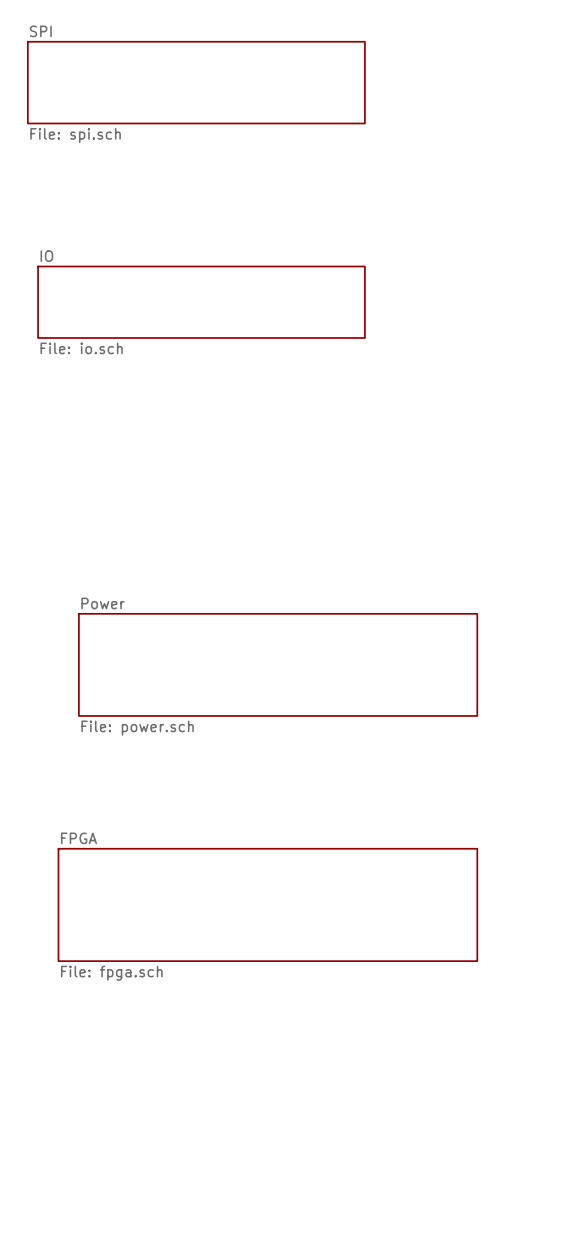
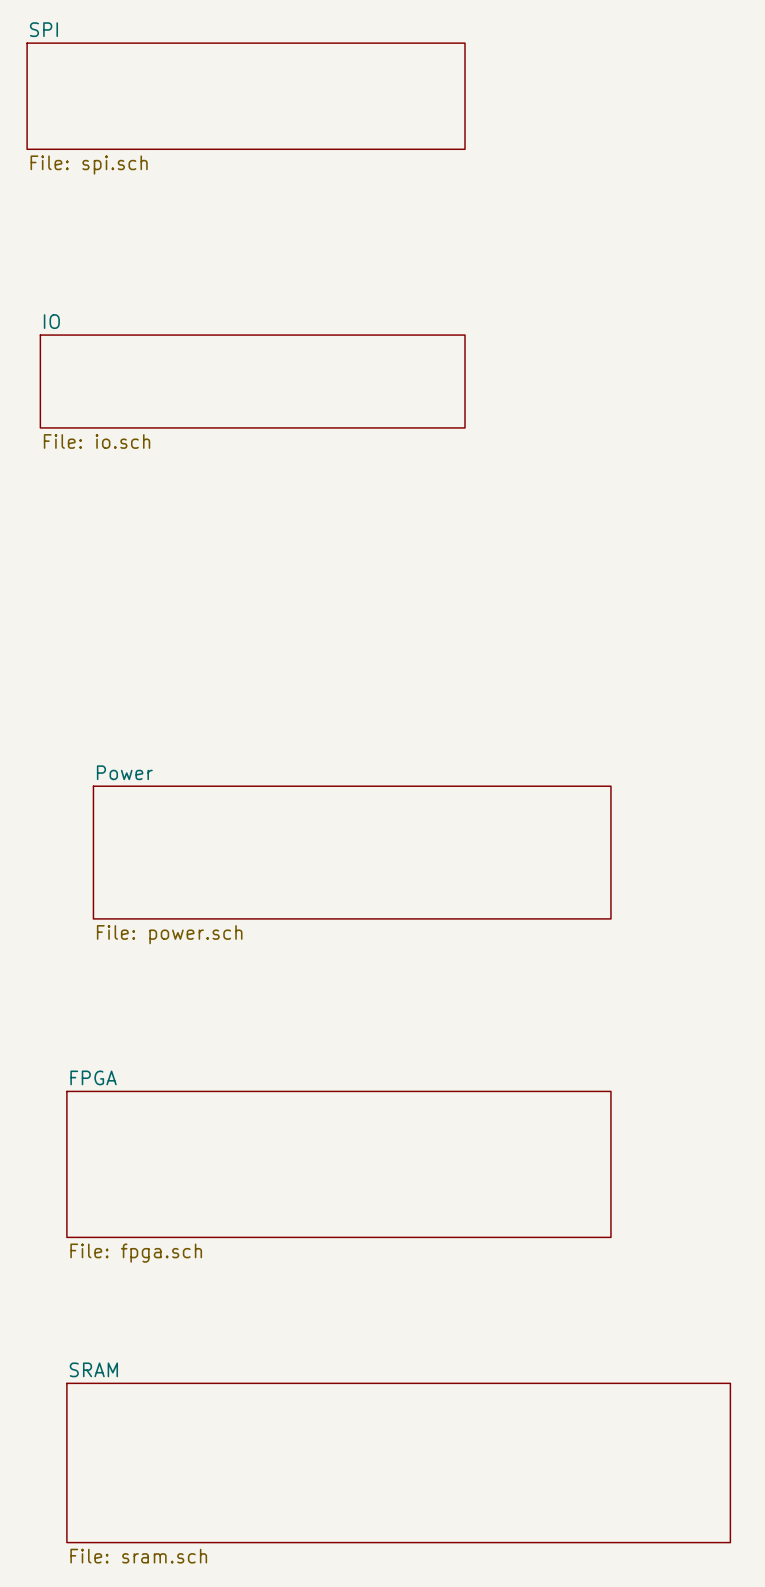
sheet SRAM: none -> File: sram.sch (398, 1462)

